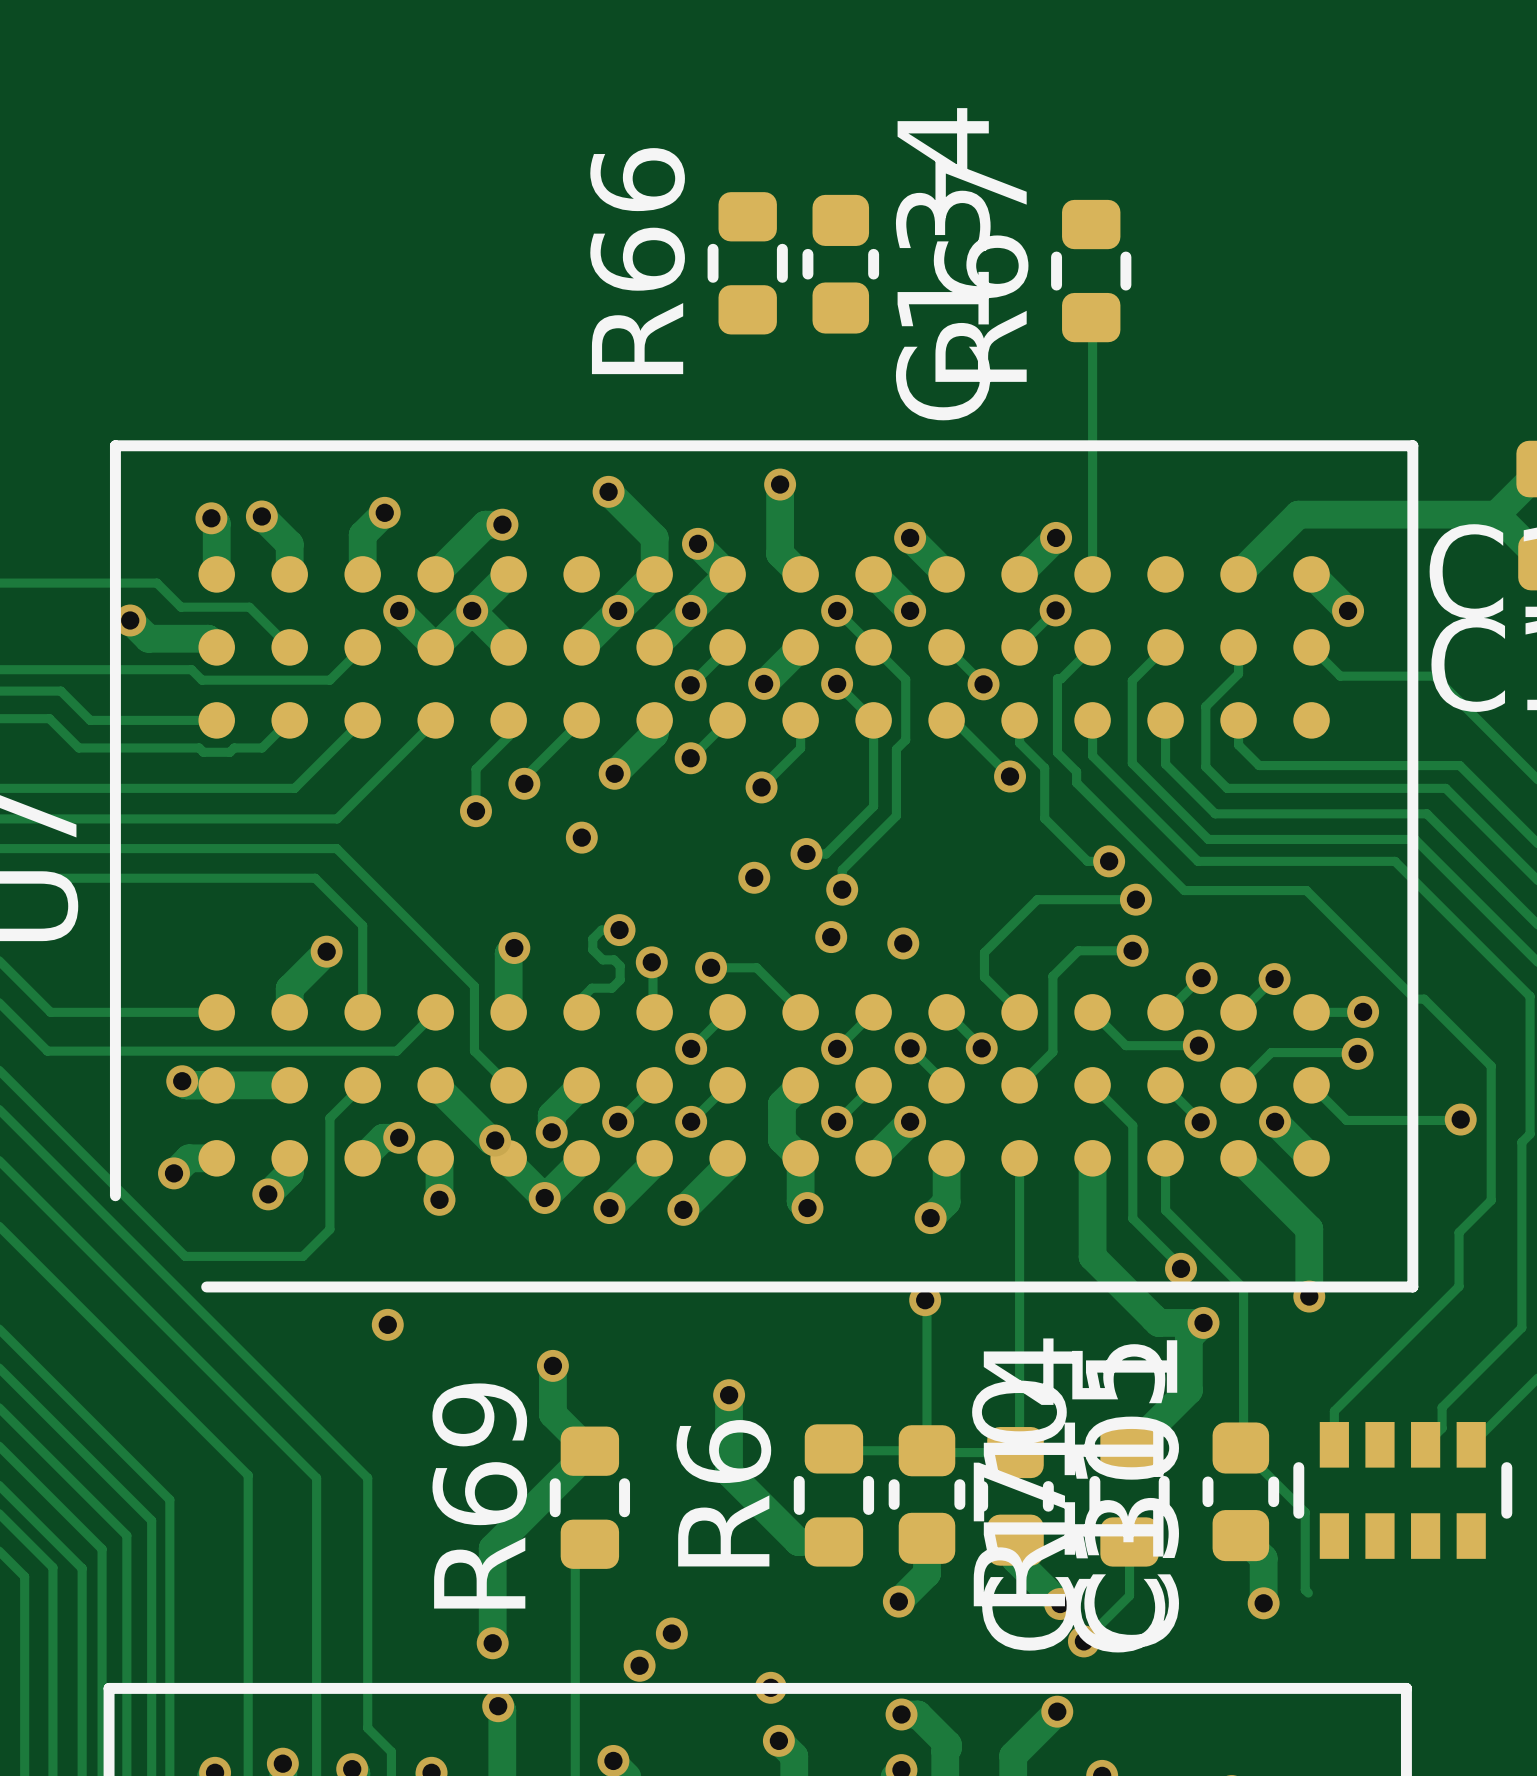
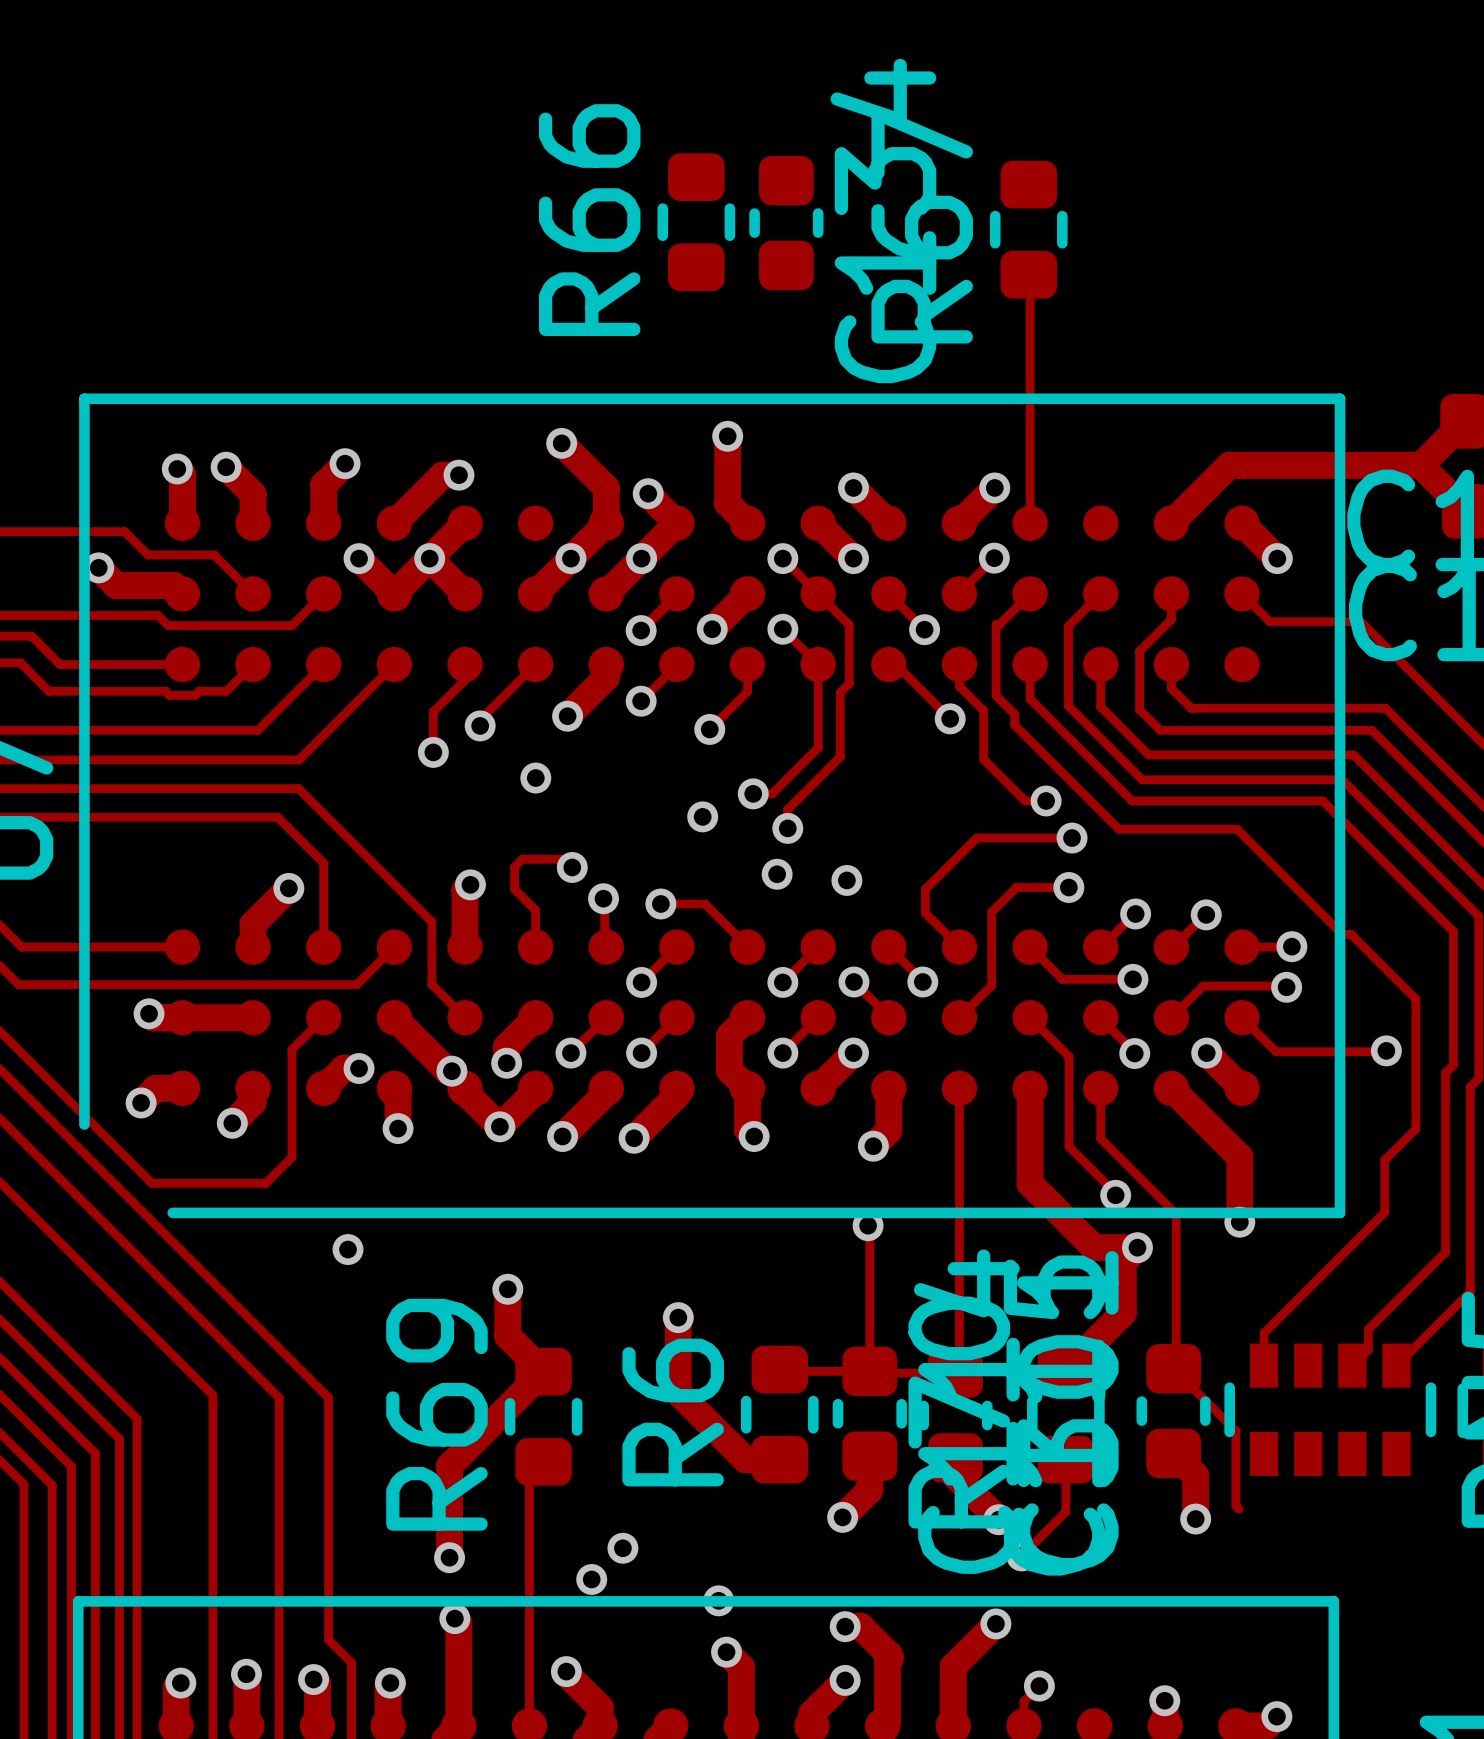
track: (619, 930) (601, 930) (592, 938) (592, 949) (602, 959) (614, 959) (620, 965) (620, 979) (611, 988) (591, 988) (581, 998) -> (572, 867) (564, 859) (522, 859) (514, 867) (514, 889) (535, 910) (535, 933)

